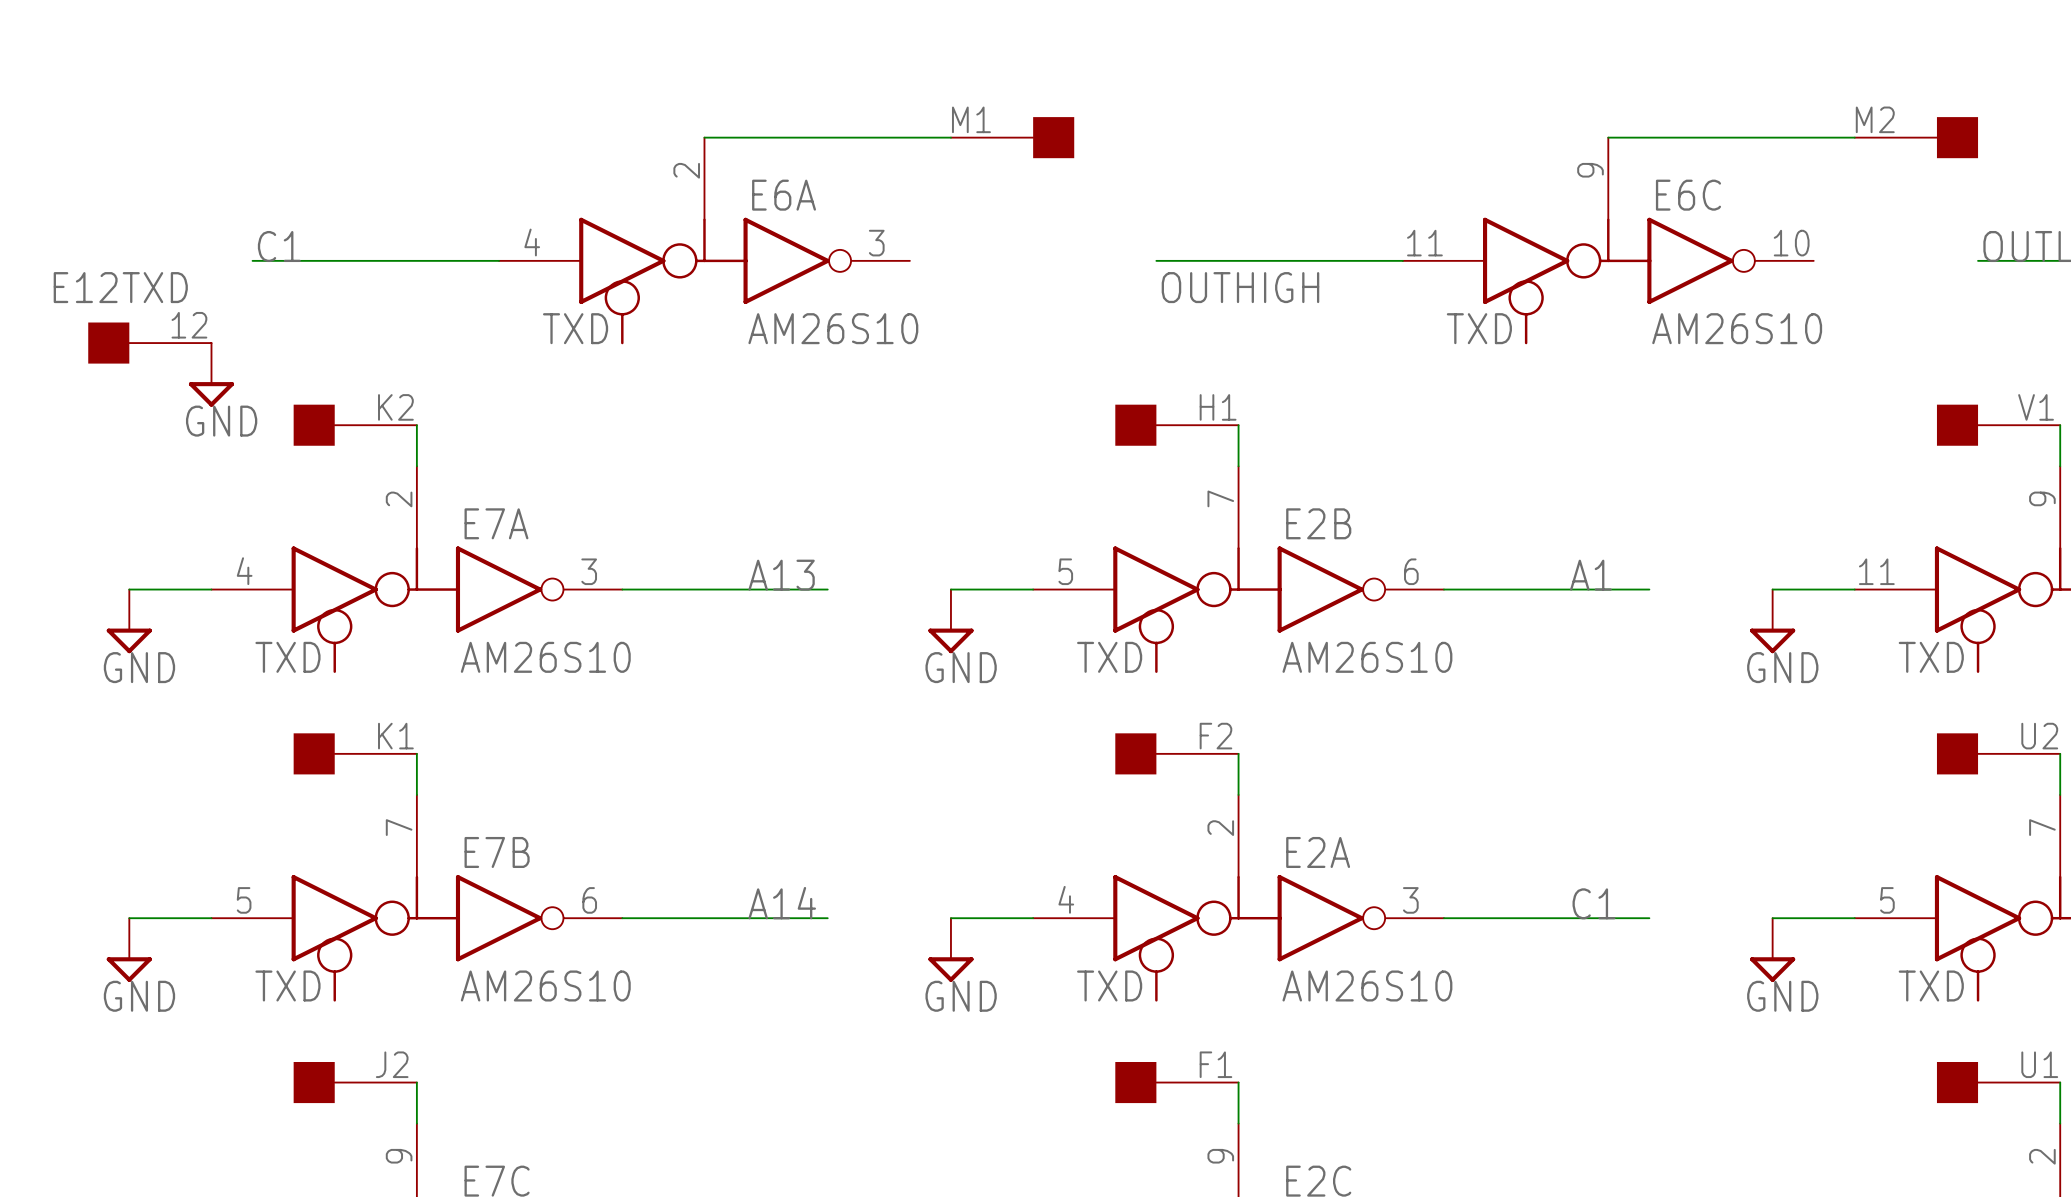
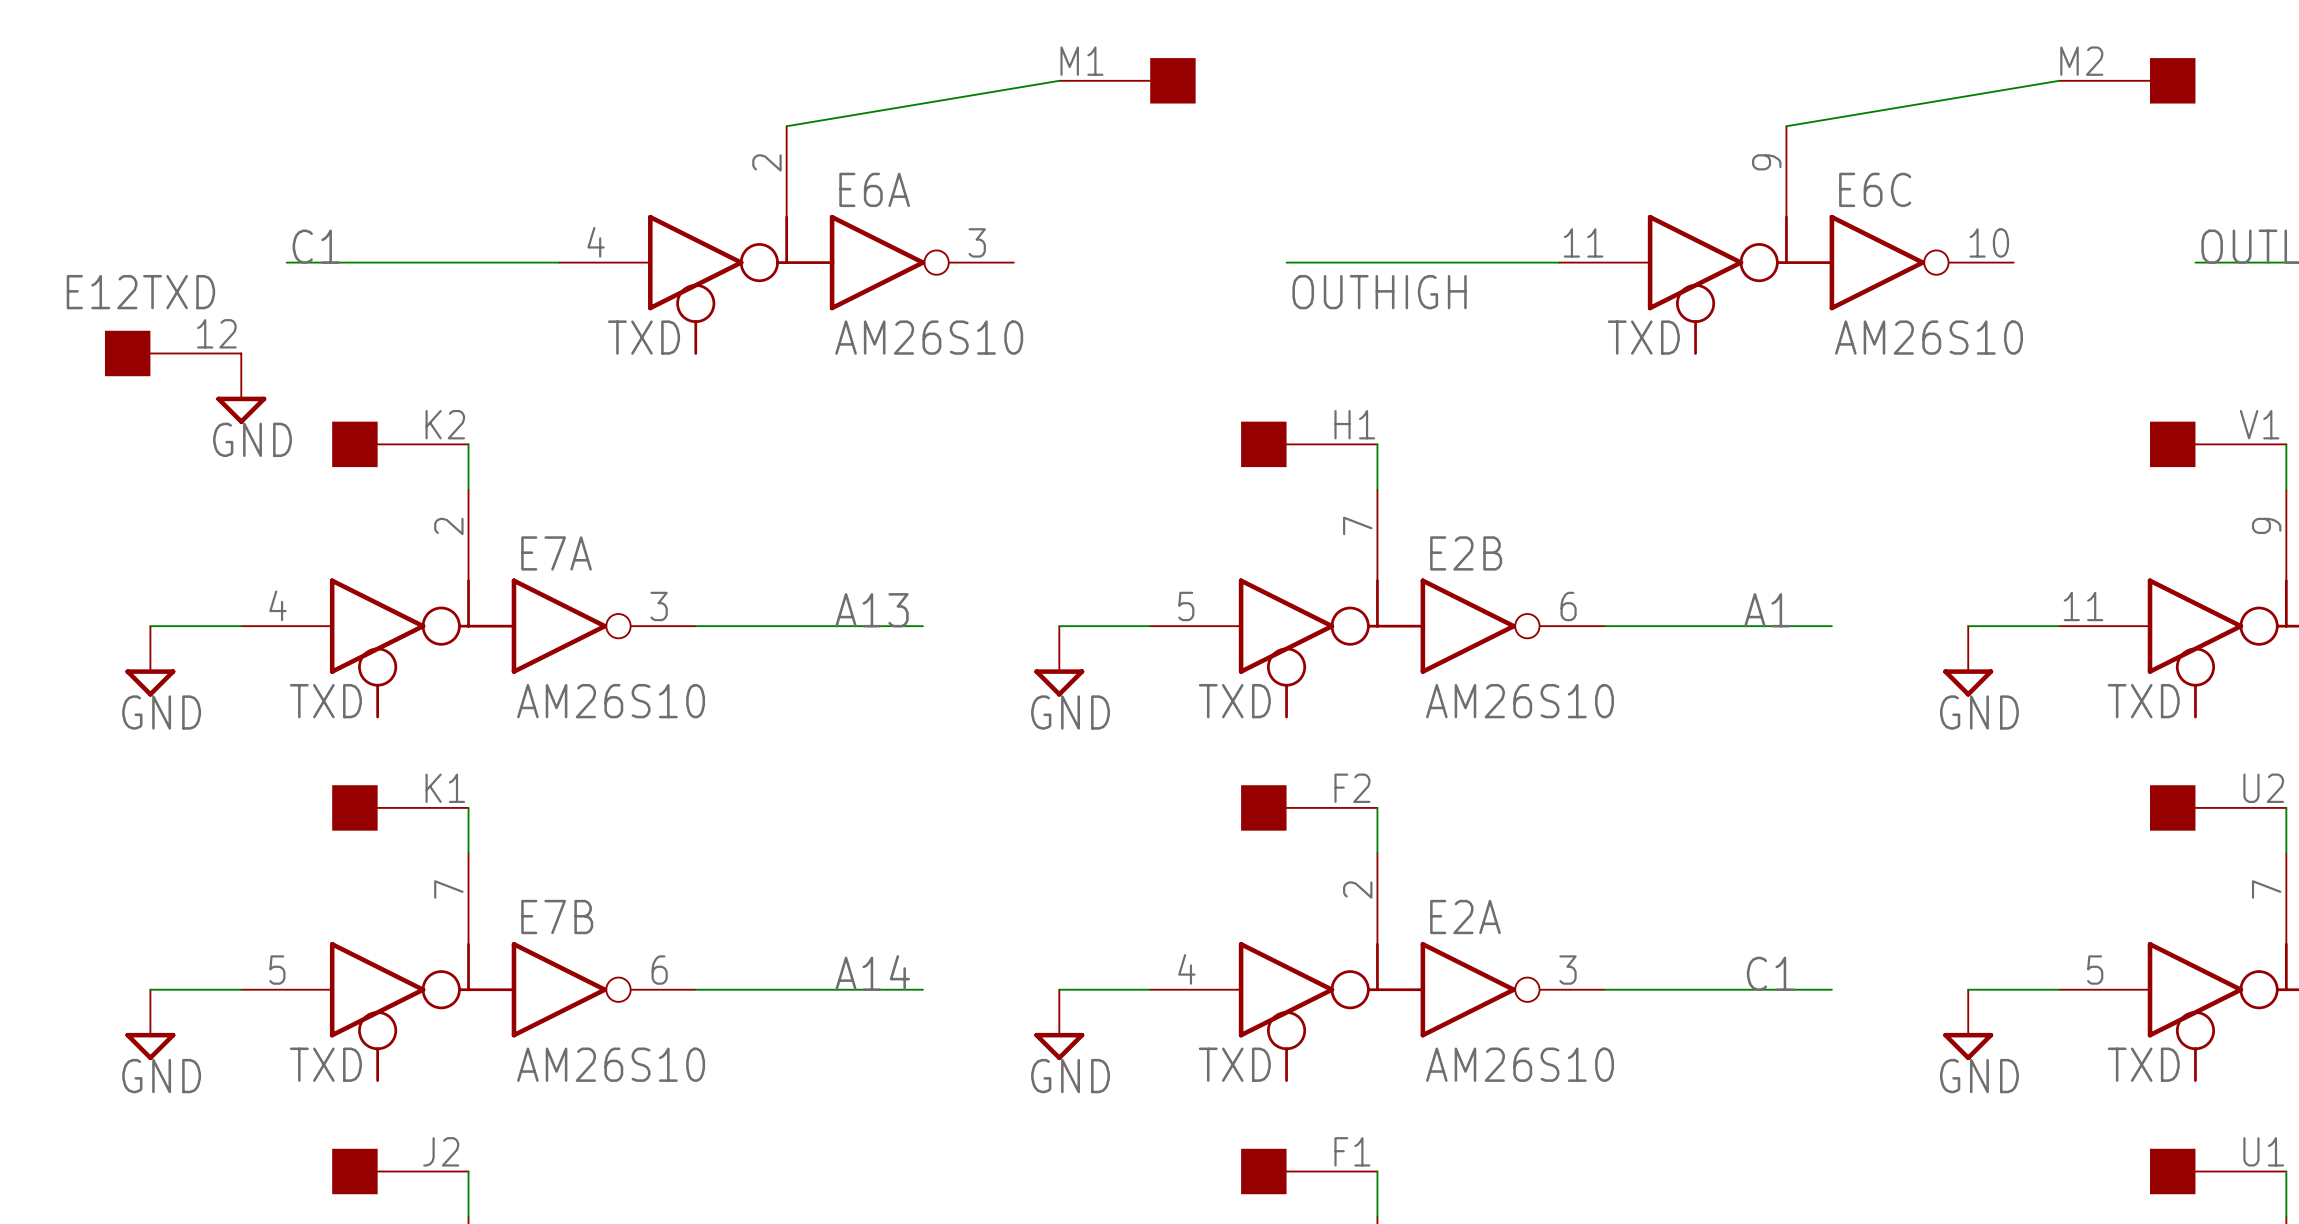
wire: (704, 137) (950, 137) -> (786, 126) (1059, 80)
part position: (1012, 137) -> (1127, 80)
wire: (1608, 137) (1854, 137) -> (1786, 126) (2059, 80)
part position: (1916, 137) -> (2127, 80)

